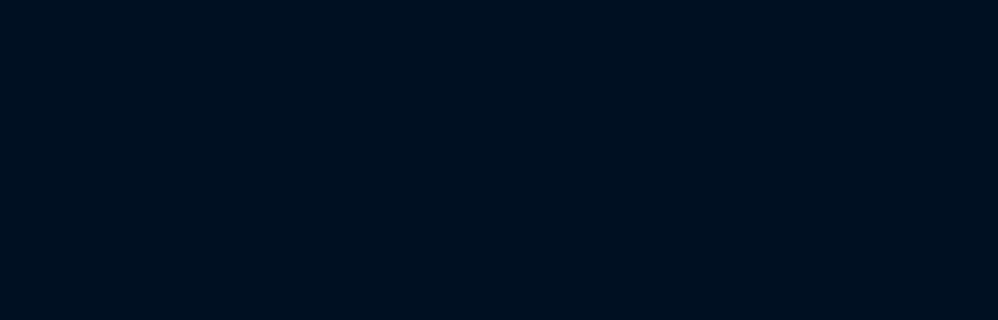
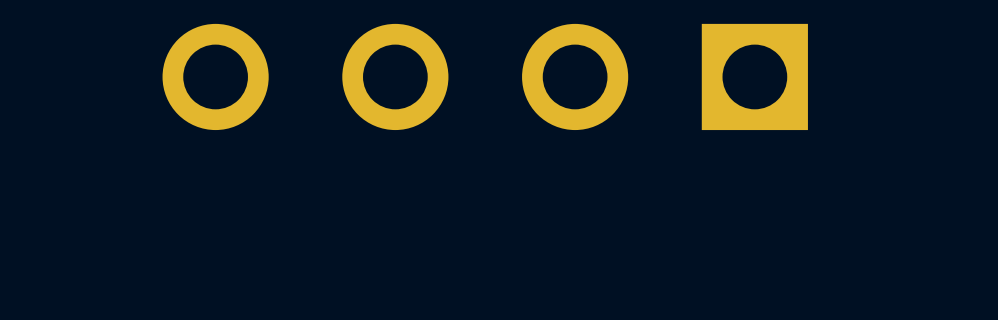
part: none -> (485, 76)

